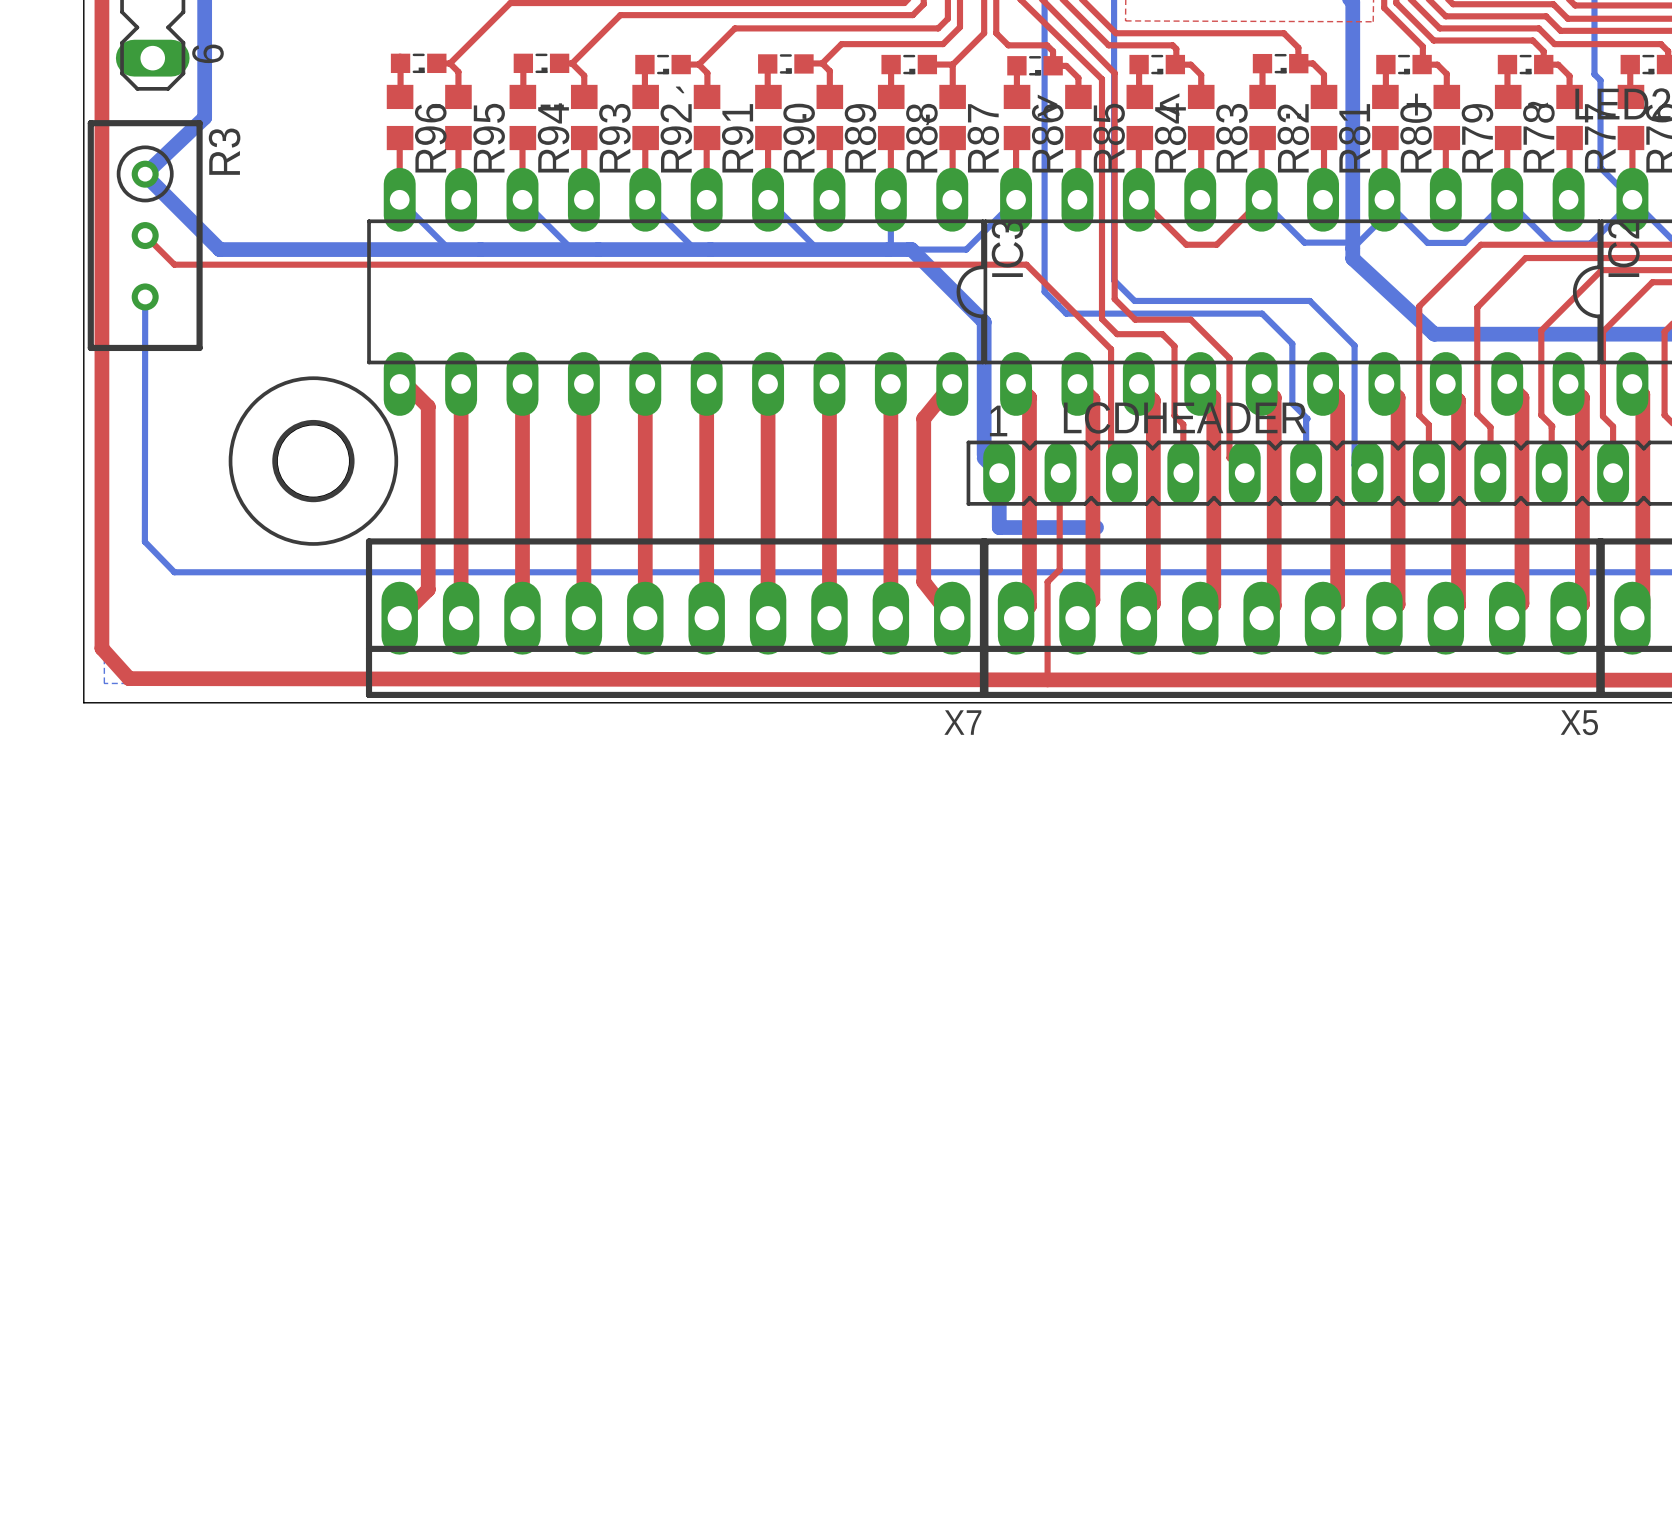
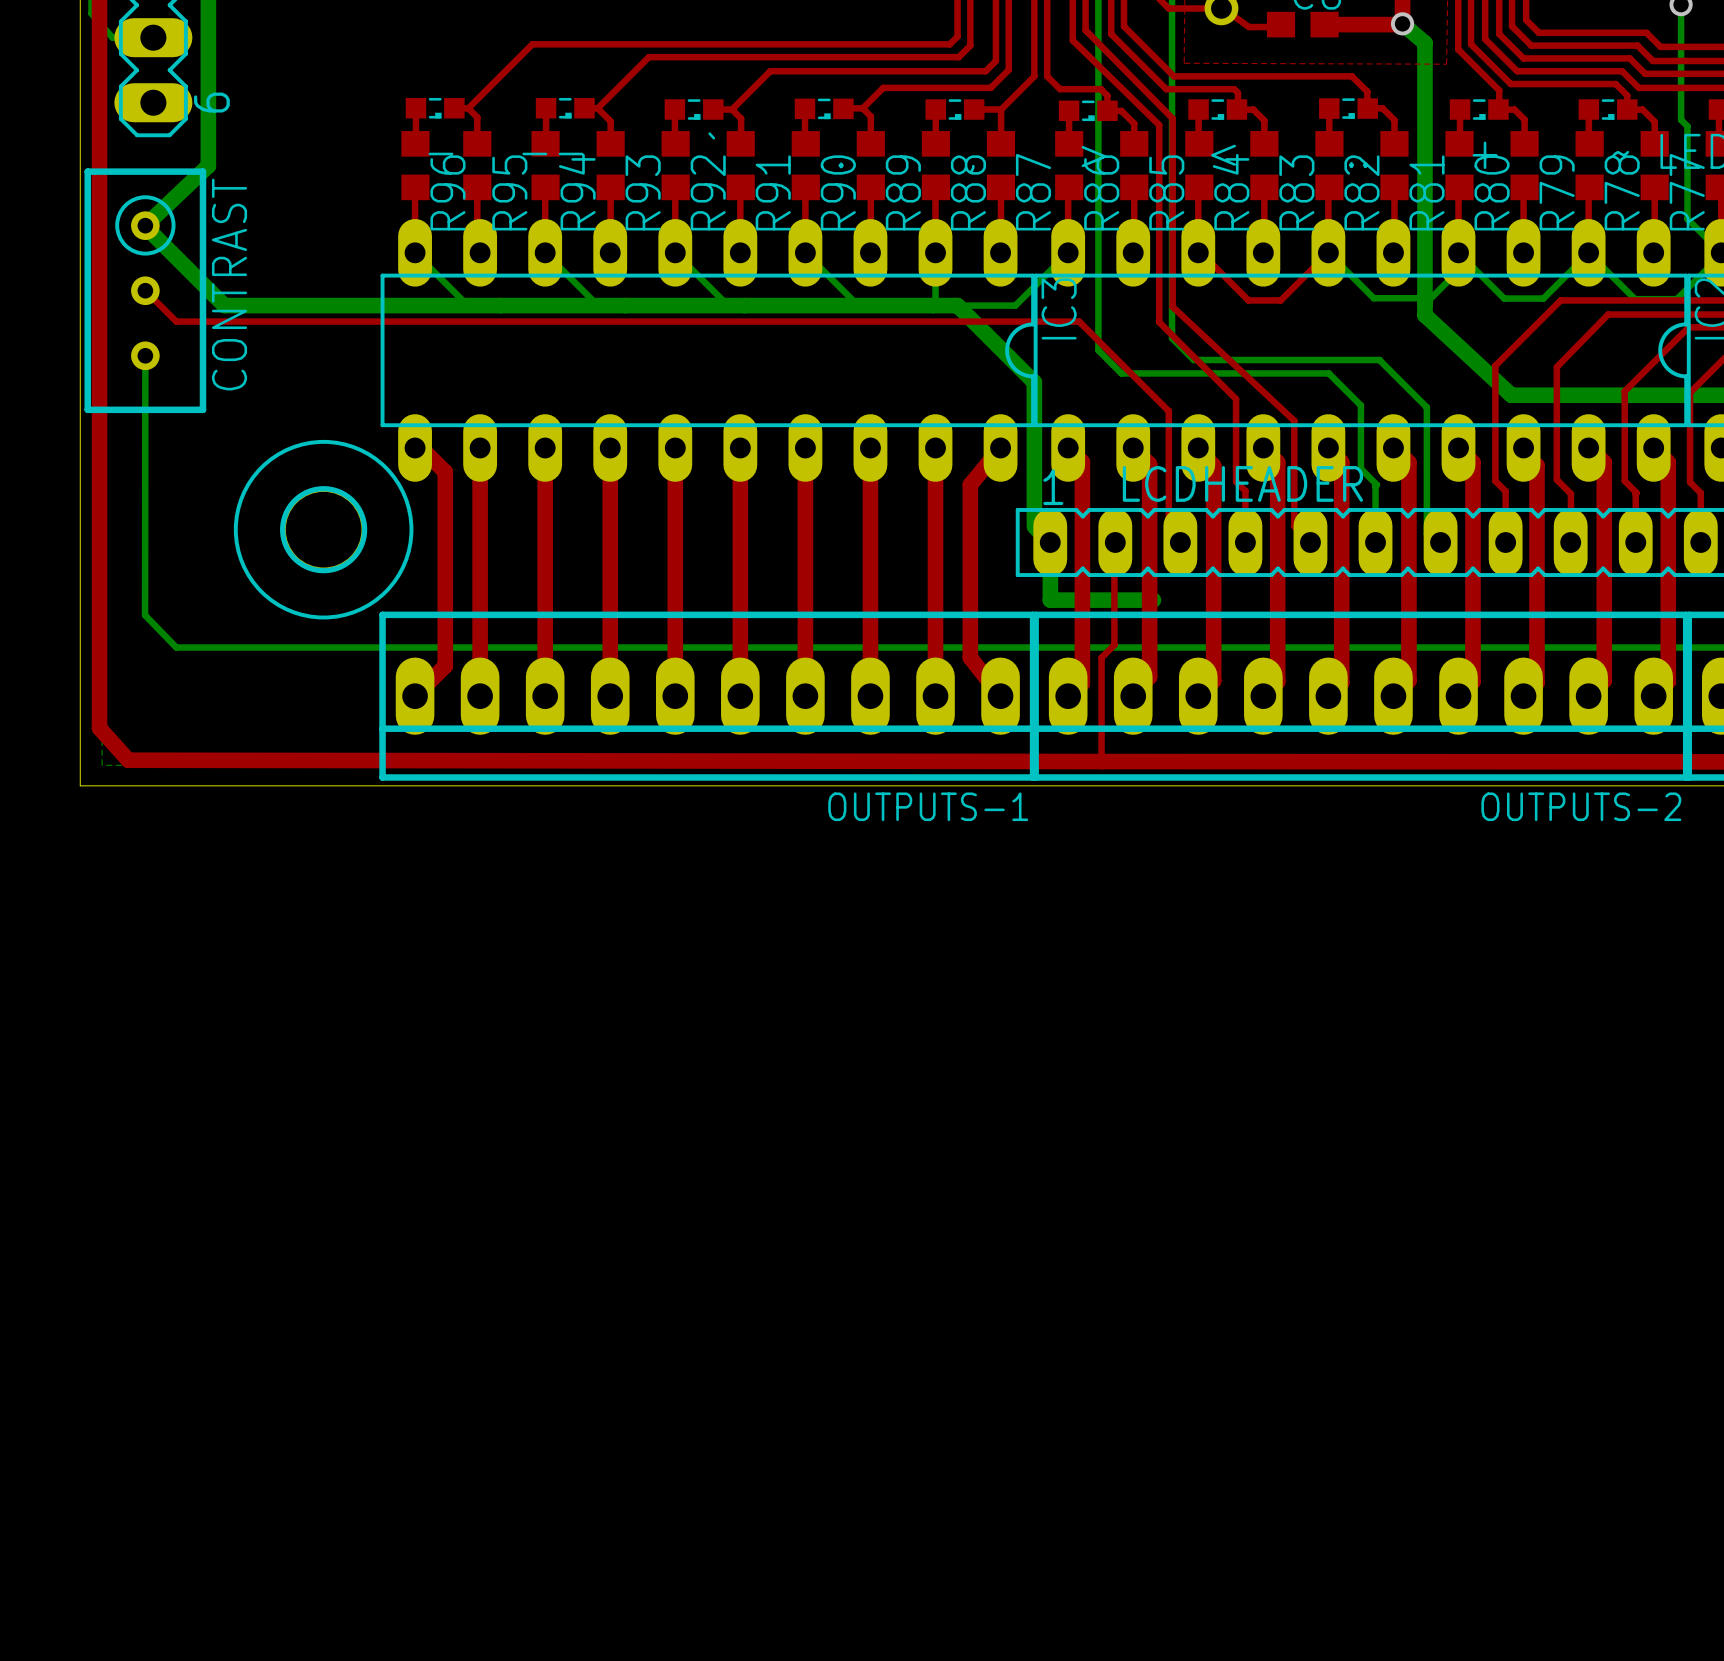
R3 name: R3 (224, 151) -> CONTRAST (229, 284)
top track: (1114, 250) (1114, 299) (1135, 319) (1190, 319) (1229, 358) -> (1172, 306) (1294, 420)
top track: (1102, 265) (1102, 319) (1117, 334) (1162, 334) (1174, 346) -> (1159, 322) (1236, 399) (1236, 408)
X7 name: X7 (962, 722) -> OUTPUTS-1 (928, 806)
X5 name: X5 (1579, 722) -> OUTPUTS-2 (1581, 806)

